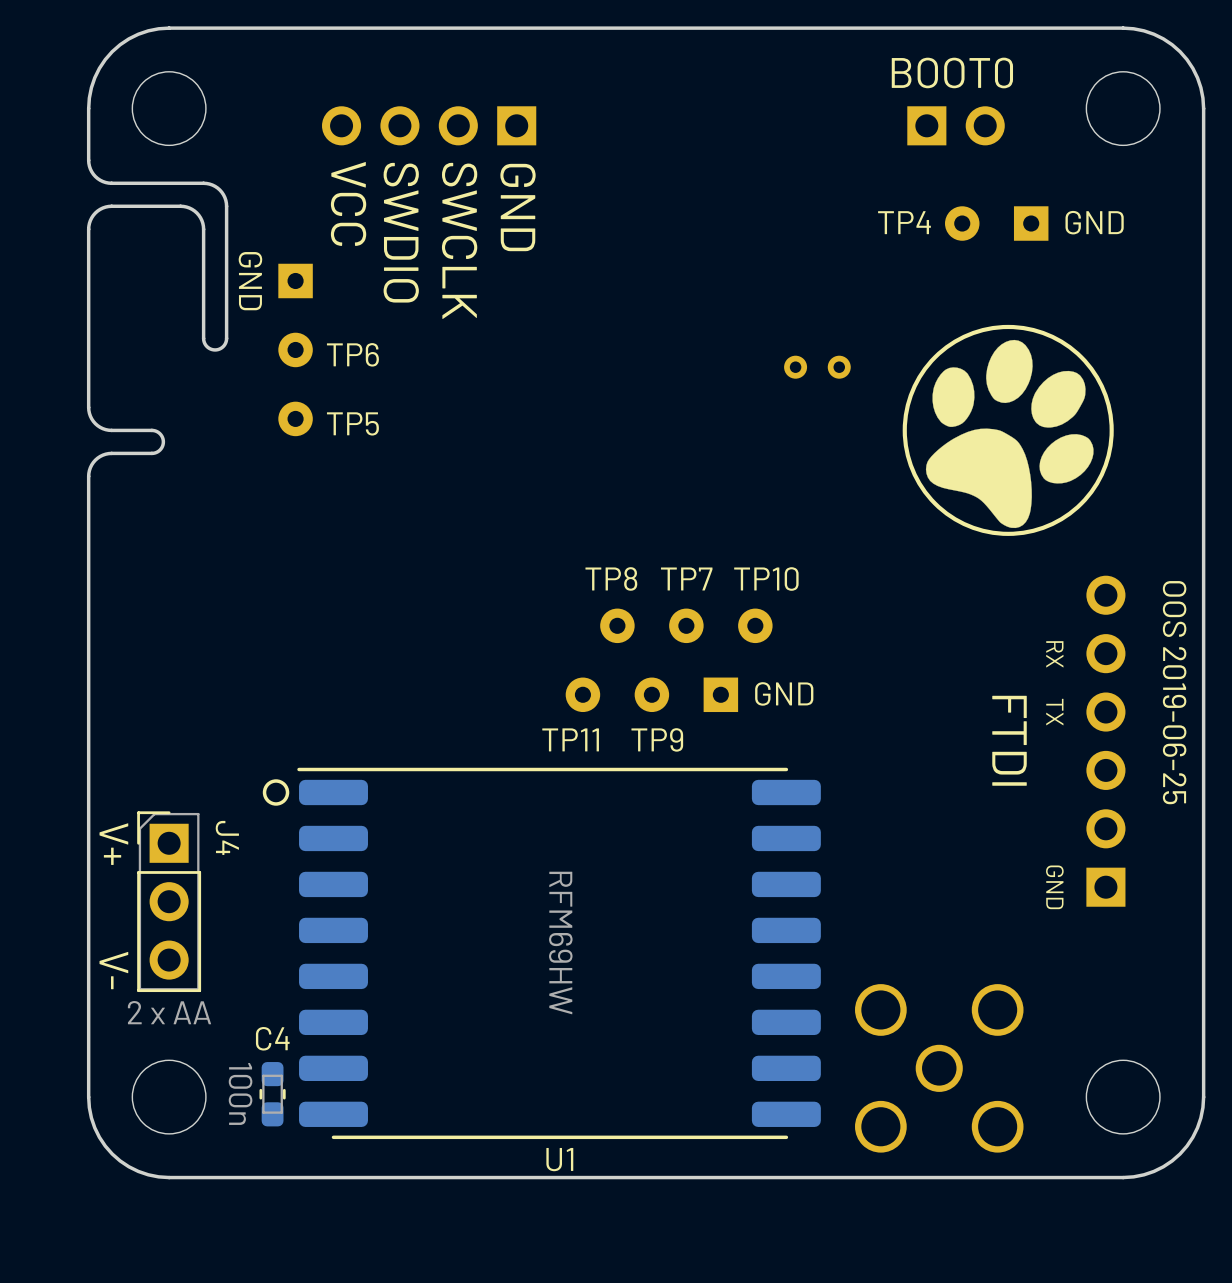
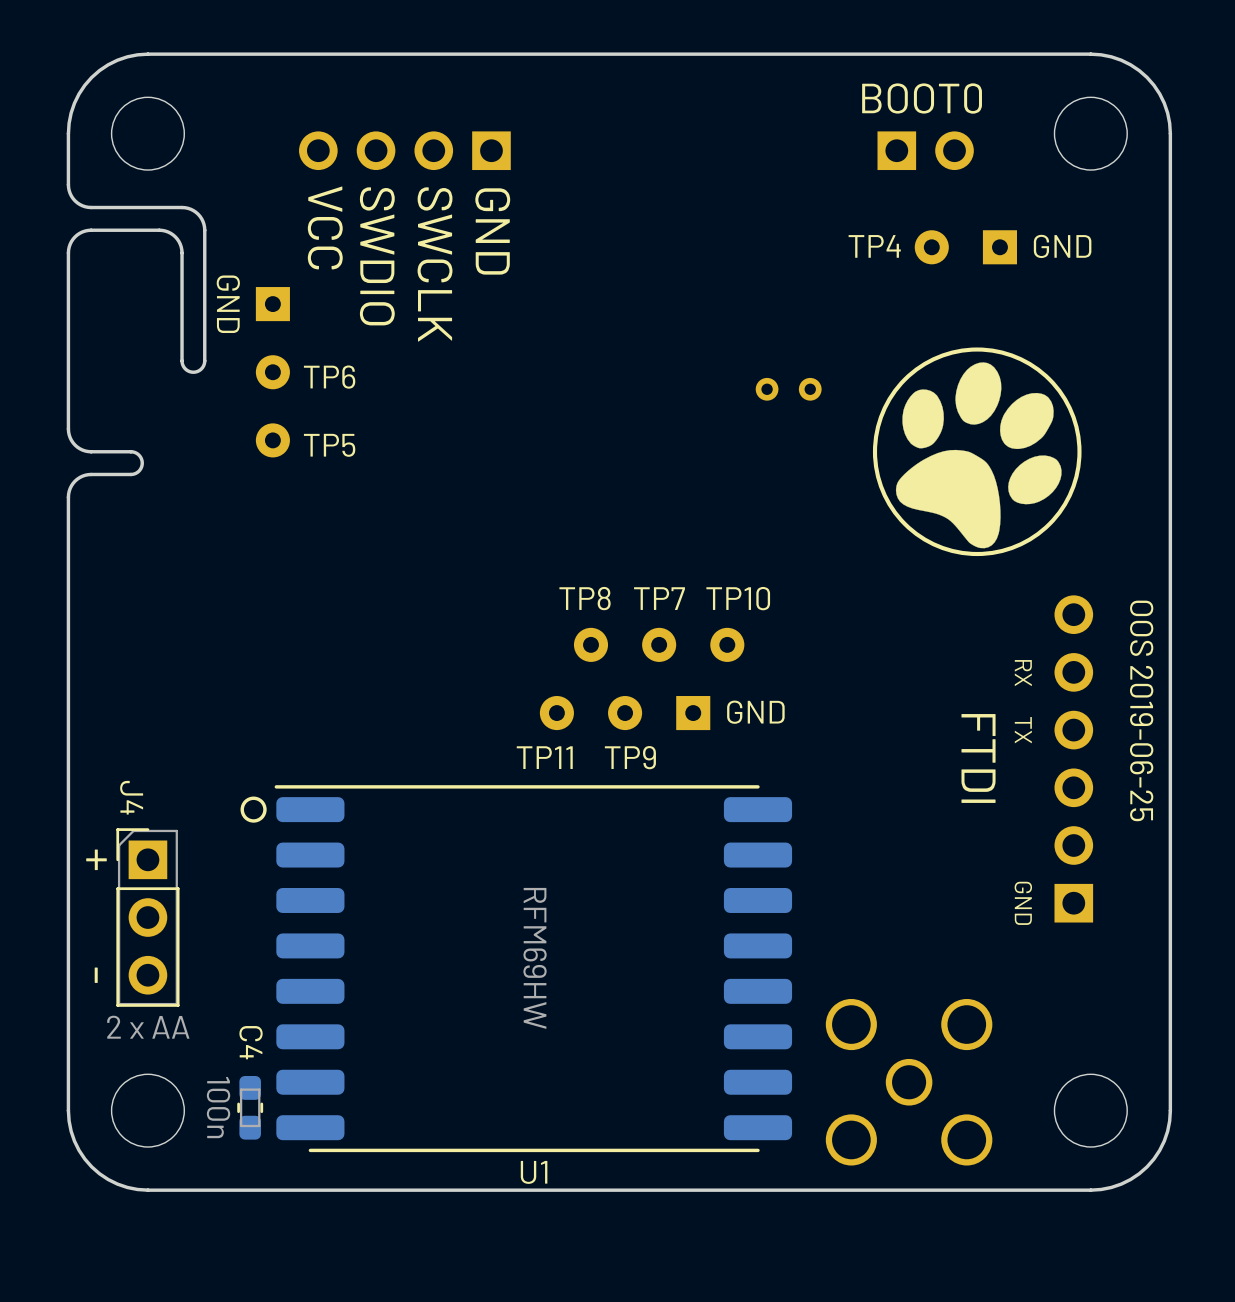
J4 name position: J4 (227, 837) -> J4 (131, 797)
text: V+ (113, 844) -> + (96, 859)
text: V- (113, 970) -> - (96, 975)
C4 name rotation: 0° (272, 1038) -> 90° clockwise (251, 1042)

